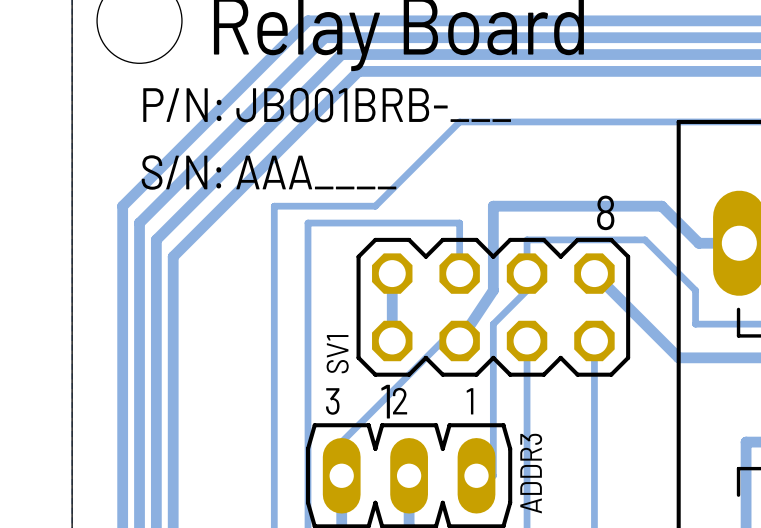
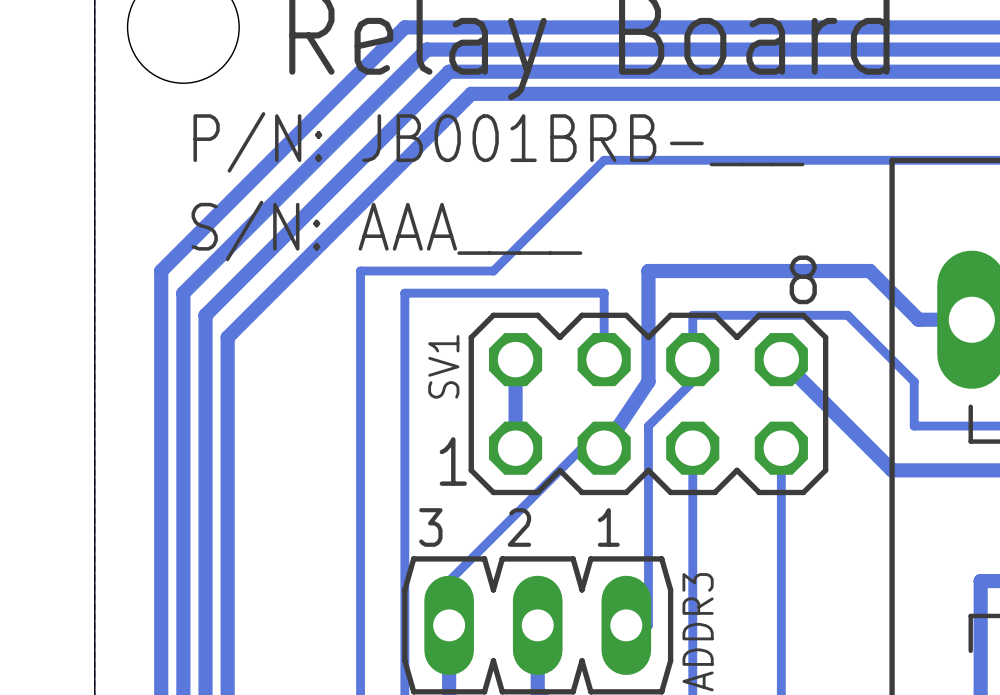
SV1 name position: SV1 (337, 354) -> SV1 (443, 366)
SV1 text position: 1 (385, 401) -> 1 (453, 461)

